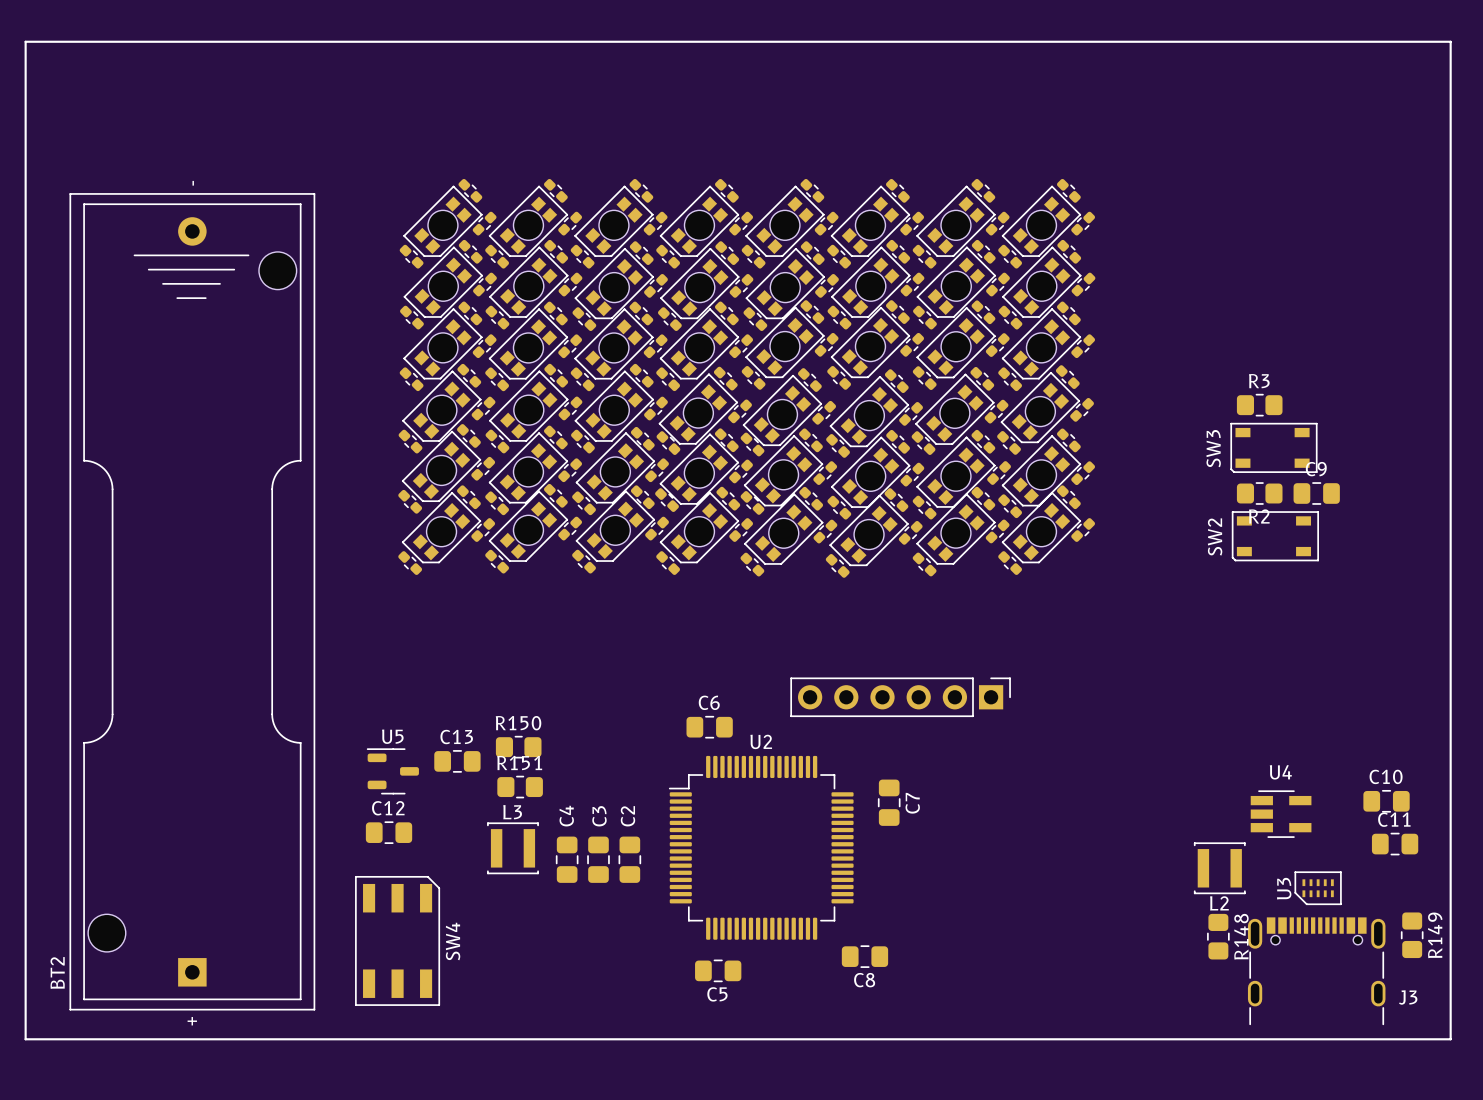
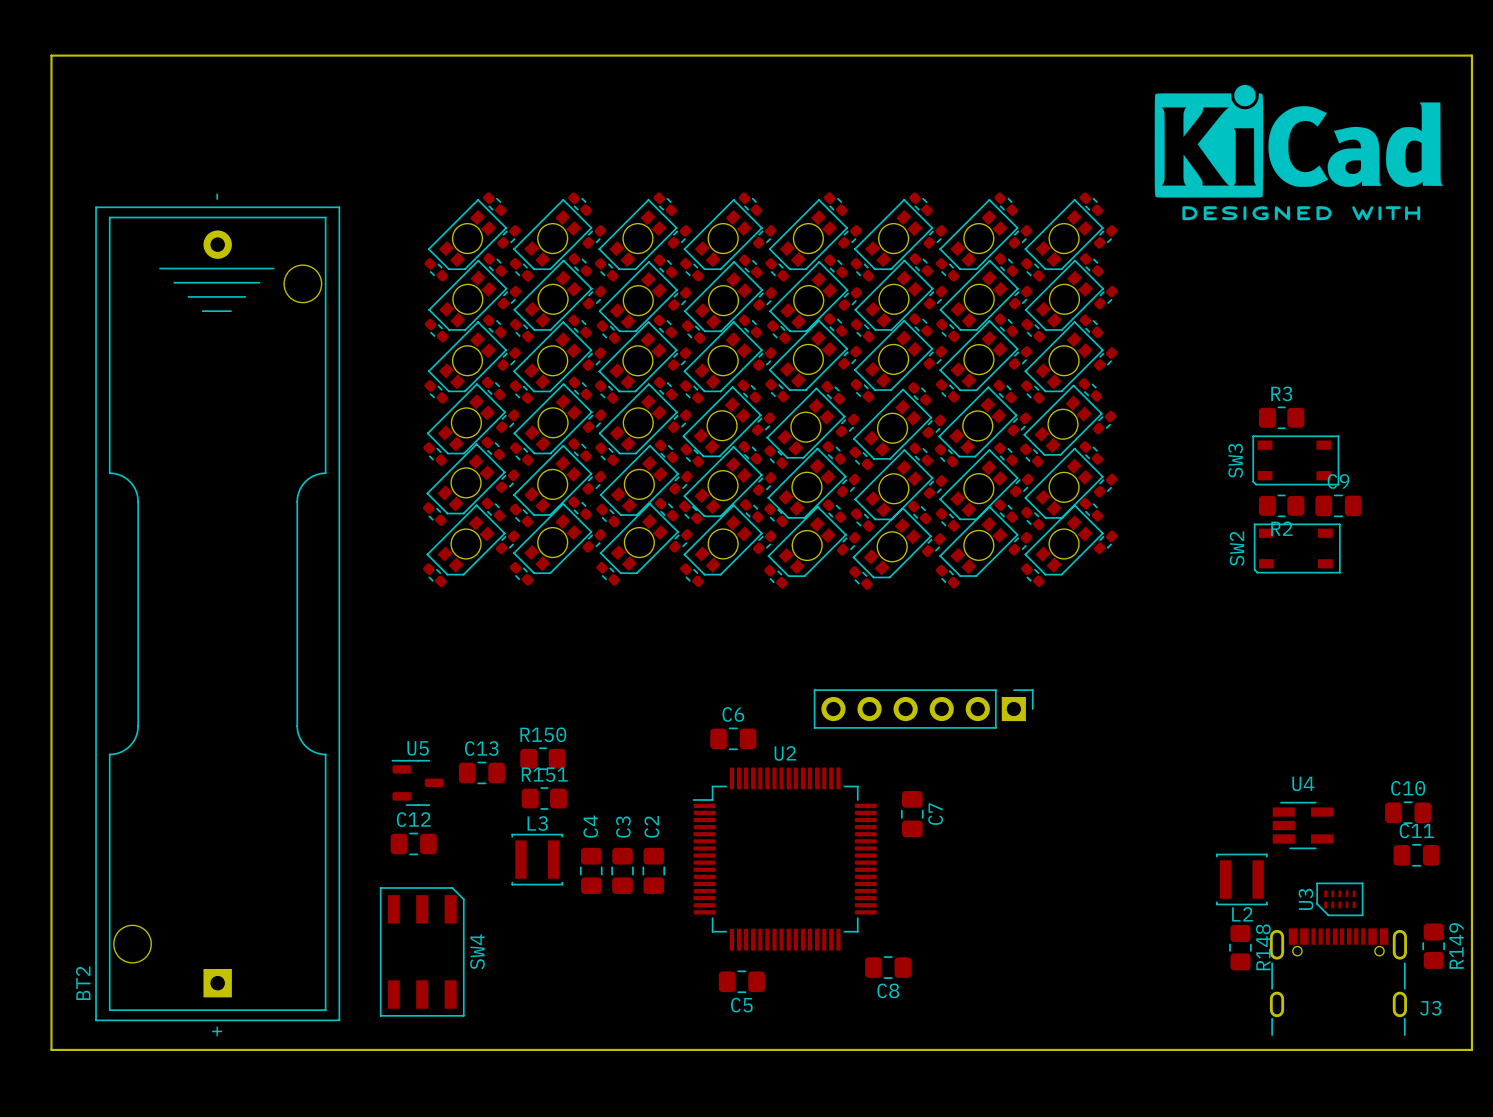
line: (25, 41) (1450, 41) (1450, 1039) (25, 1039) (25, 41) -> none
board edge: none -> (51, 55) (1471, 55) (1471, 1049) (51, 1049) (51, 55)
drawing: none -> [1154, 84, 1443, 221]

